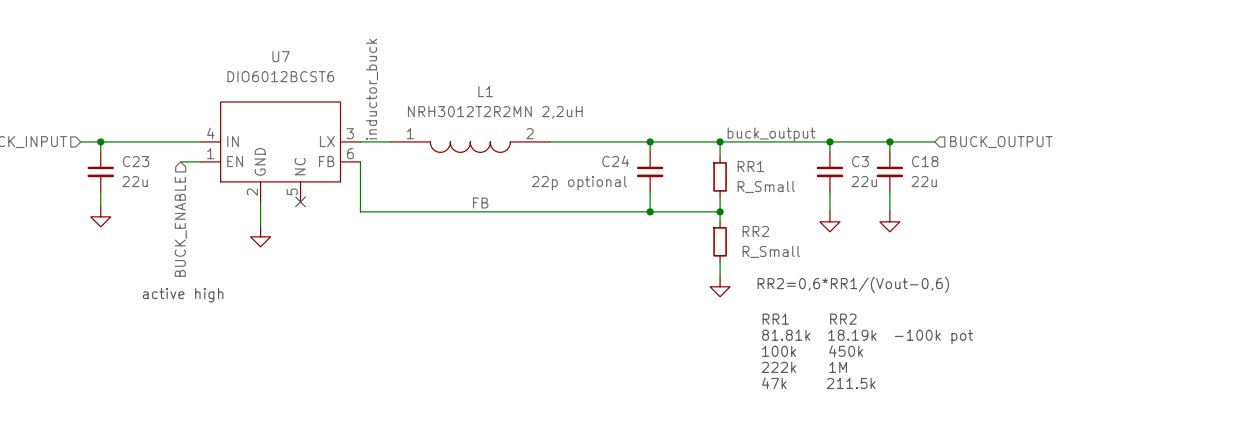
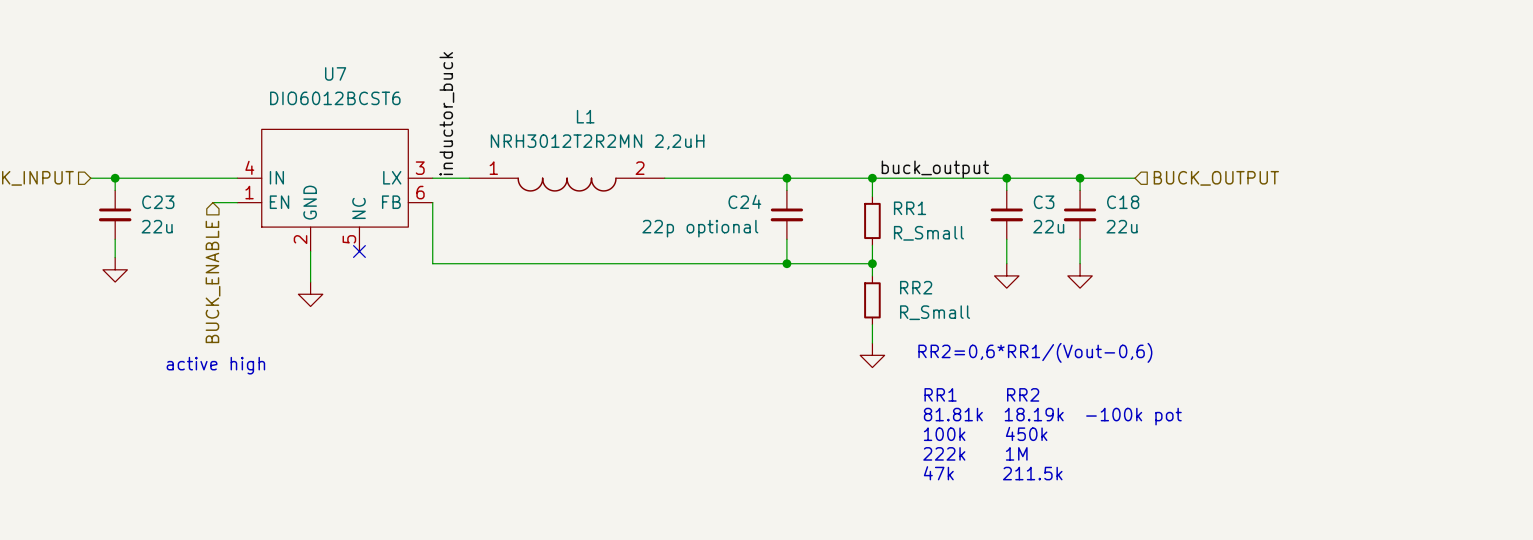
label: FB (480, 202) -> none

